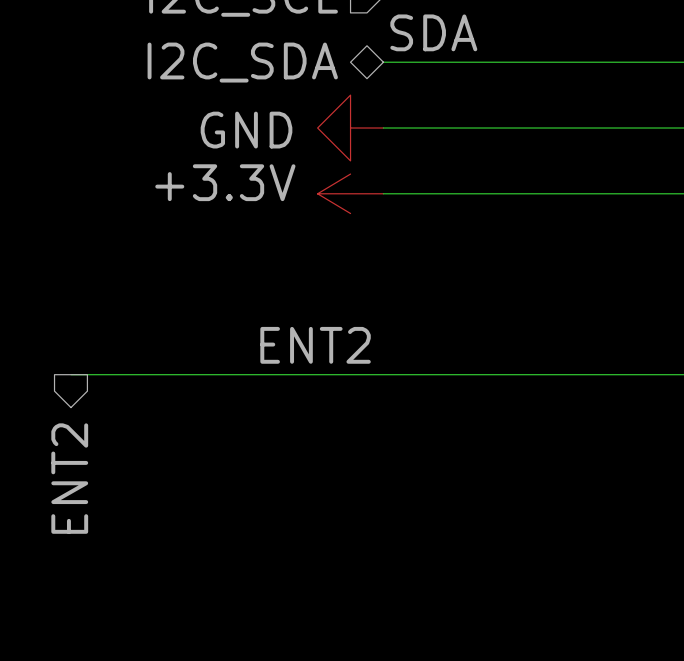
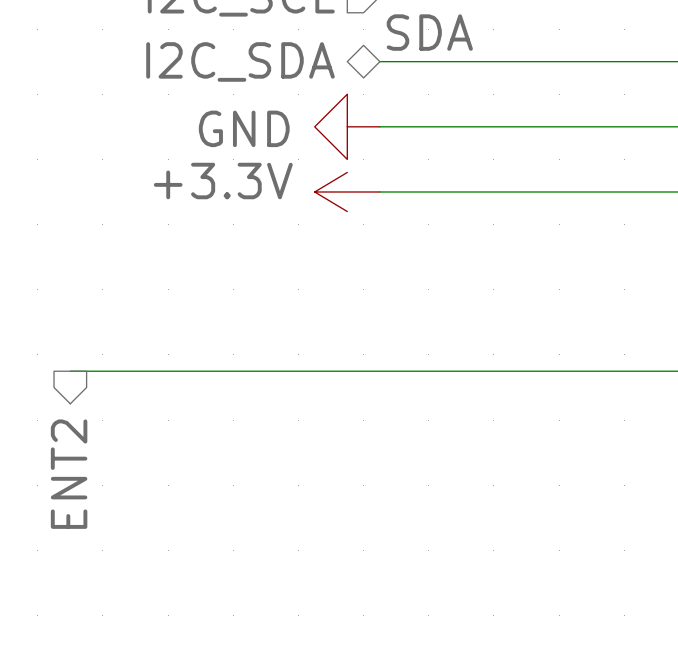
label: ENT2 (315, 345) -> none

